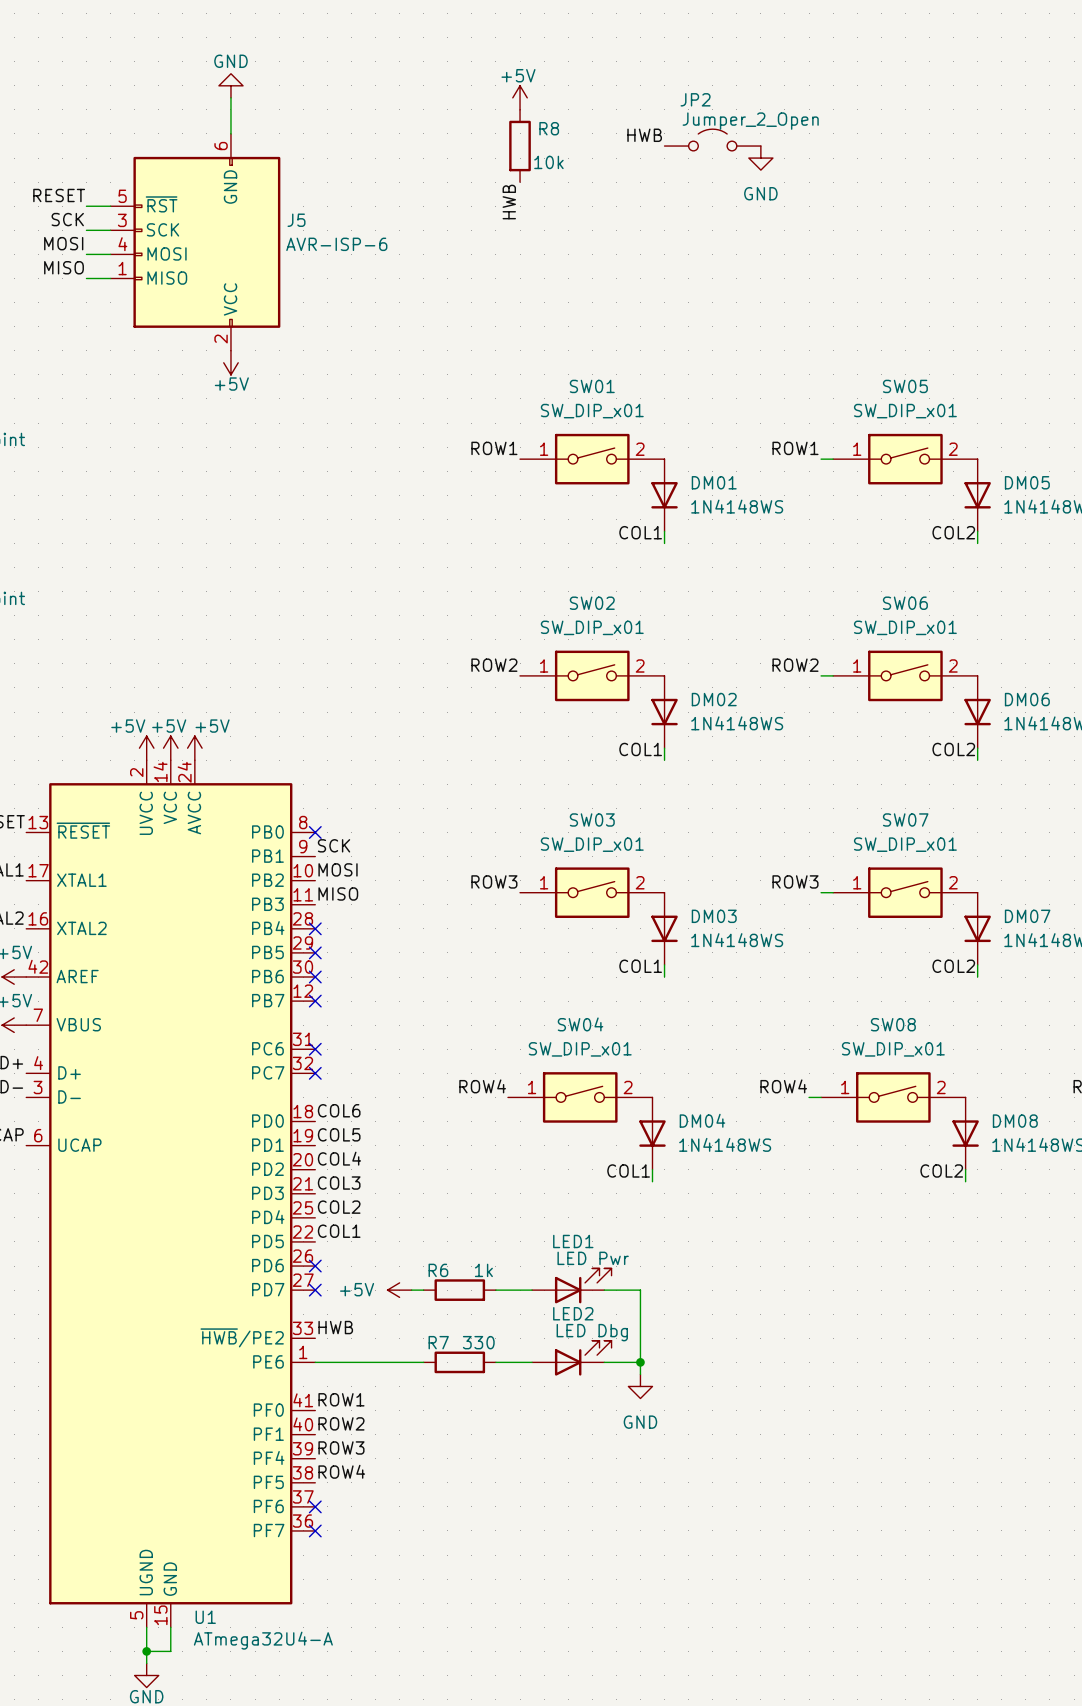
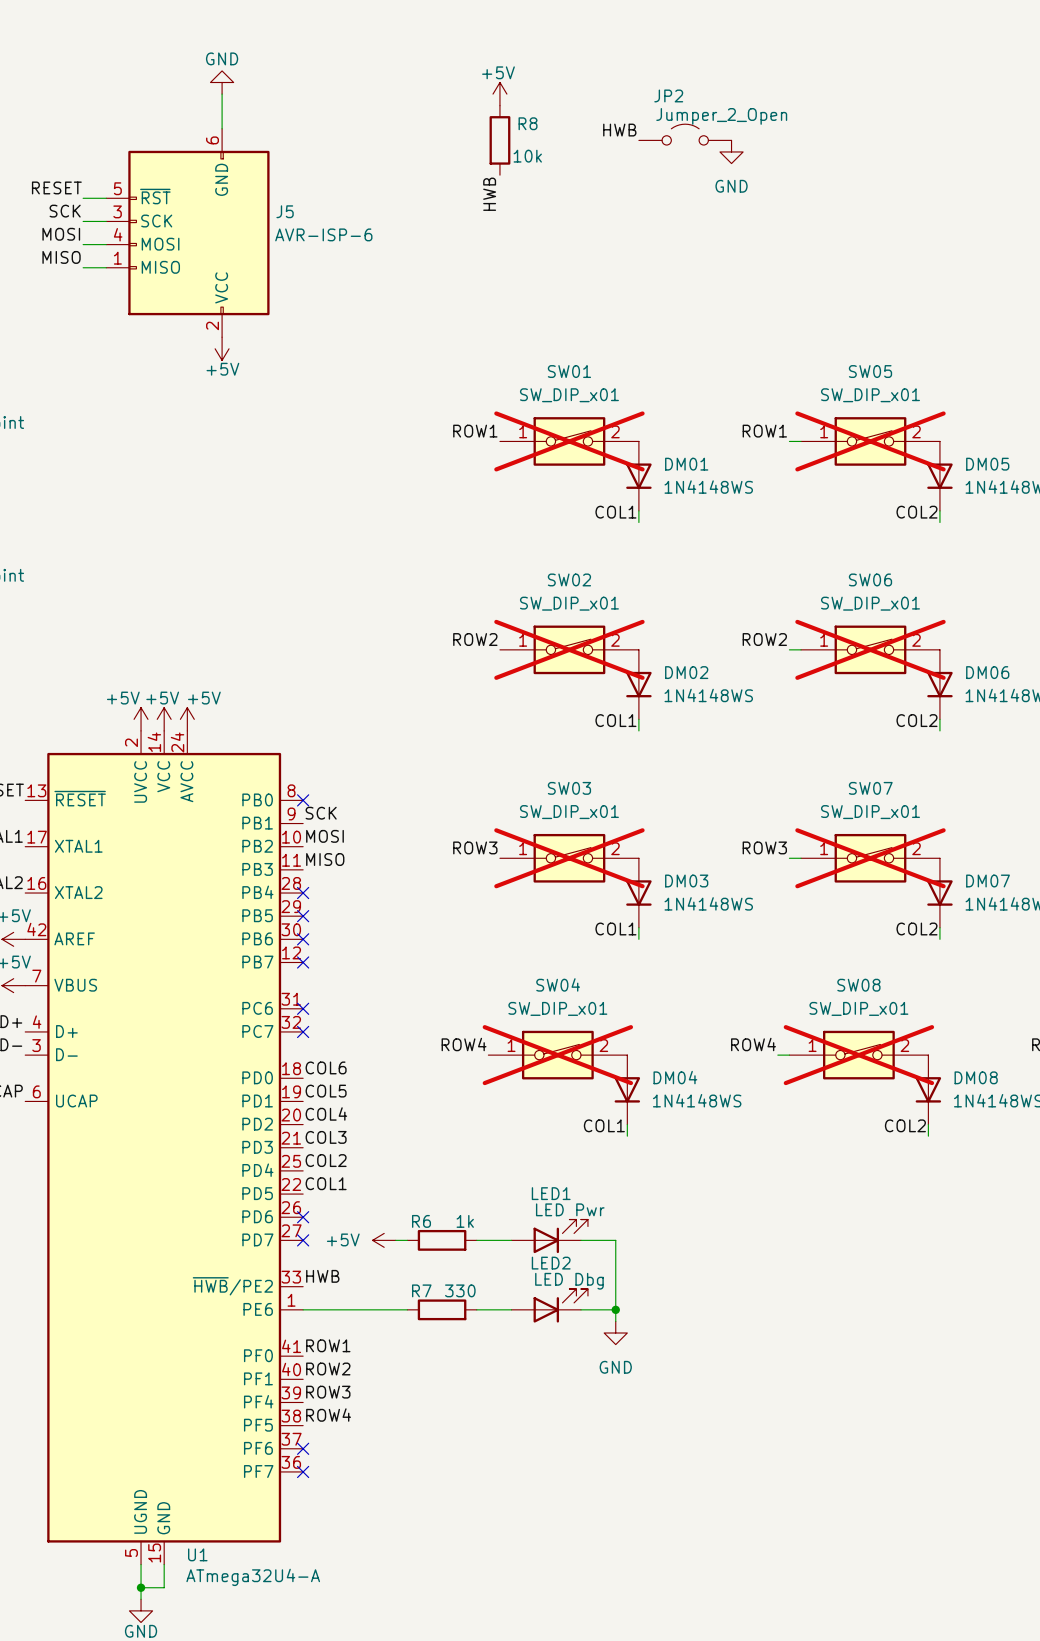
SW01 do-not-place cross: none -> (569, 441)
SW05 do-not-place cross: none -> (870, 441)
SW02 do-not-place cross: none -> (569, 649)
SW06 do-not-place cross: none -> (870, 649)
SW03 do-not-place cross: none -> (569, 858)
SW07 do-not-place cross: none -> (870, 858)
SW04 do-not-place cross: none -> (557, 1055)
SW08 do-not-place cross: none -> (858, 1055)

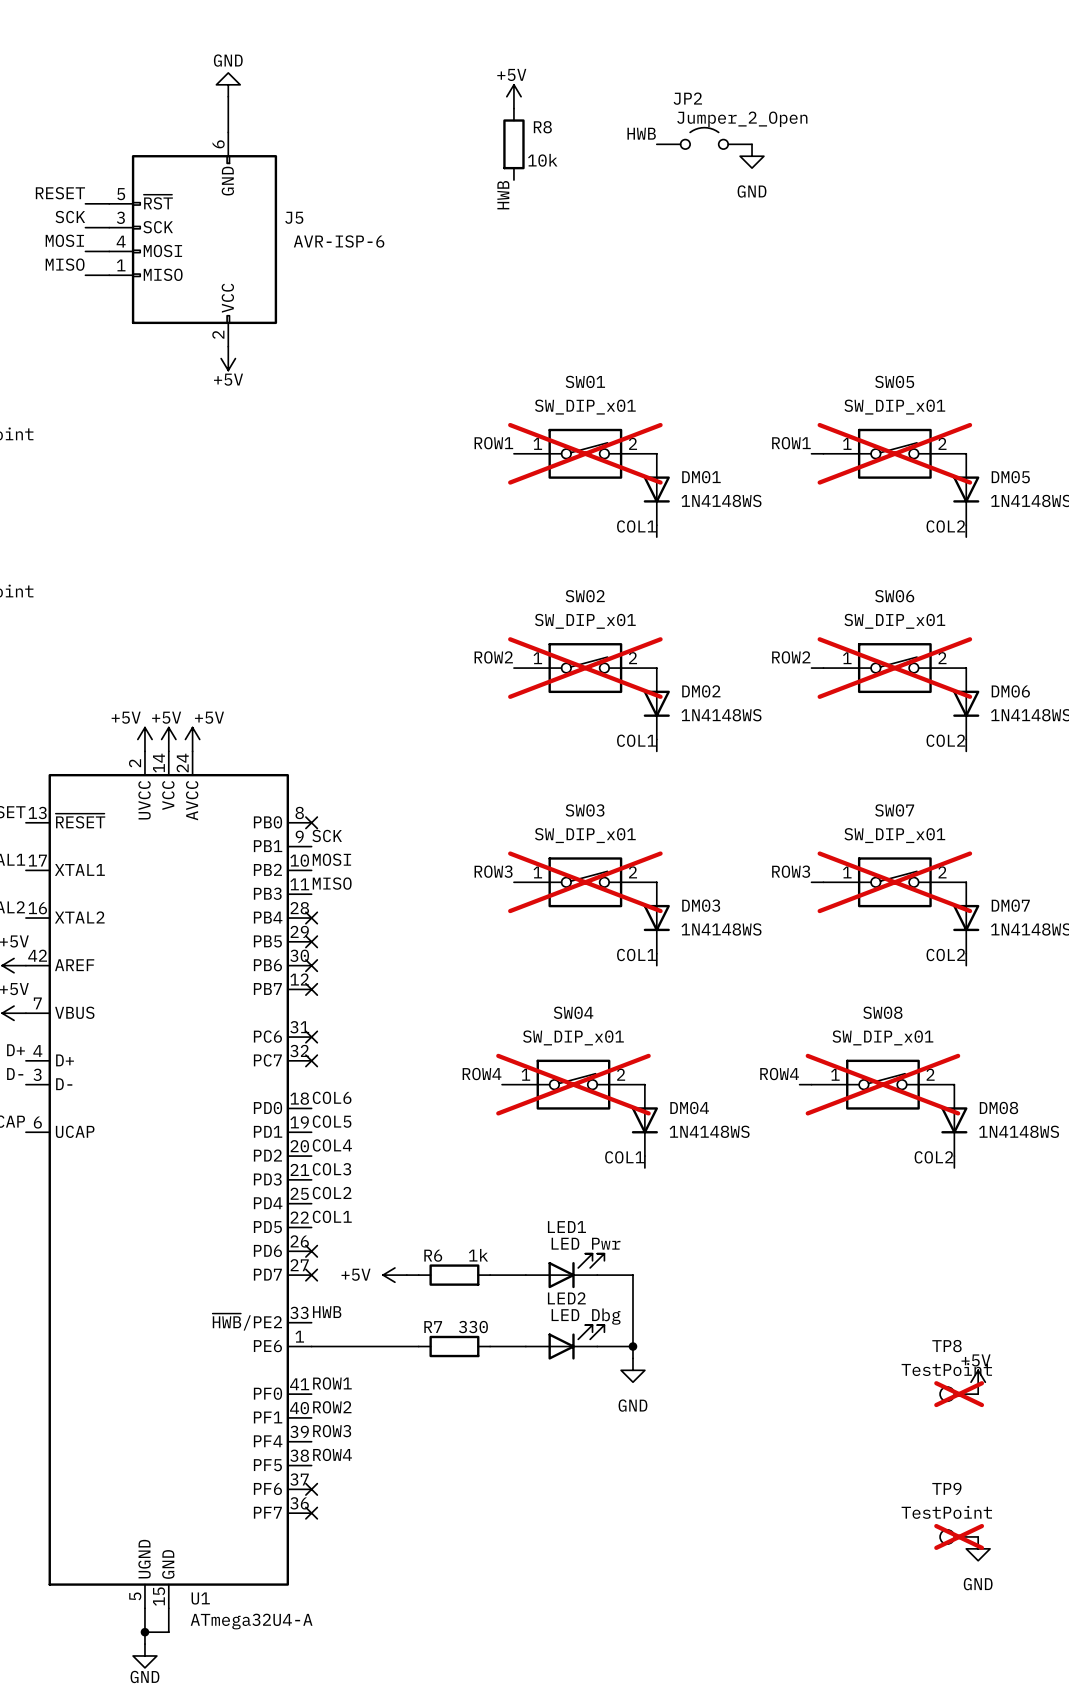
power symbol: none -> +5V (978, 1382)
TP8: none -> TestPoint (959, 1394)
TP9: none -> TestPoint (959, 1536)
power symbol: none -> GND (978, 1548)

